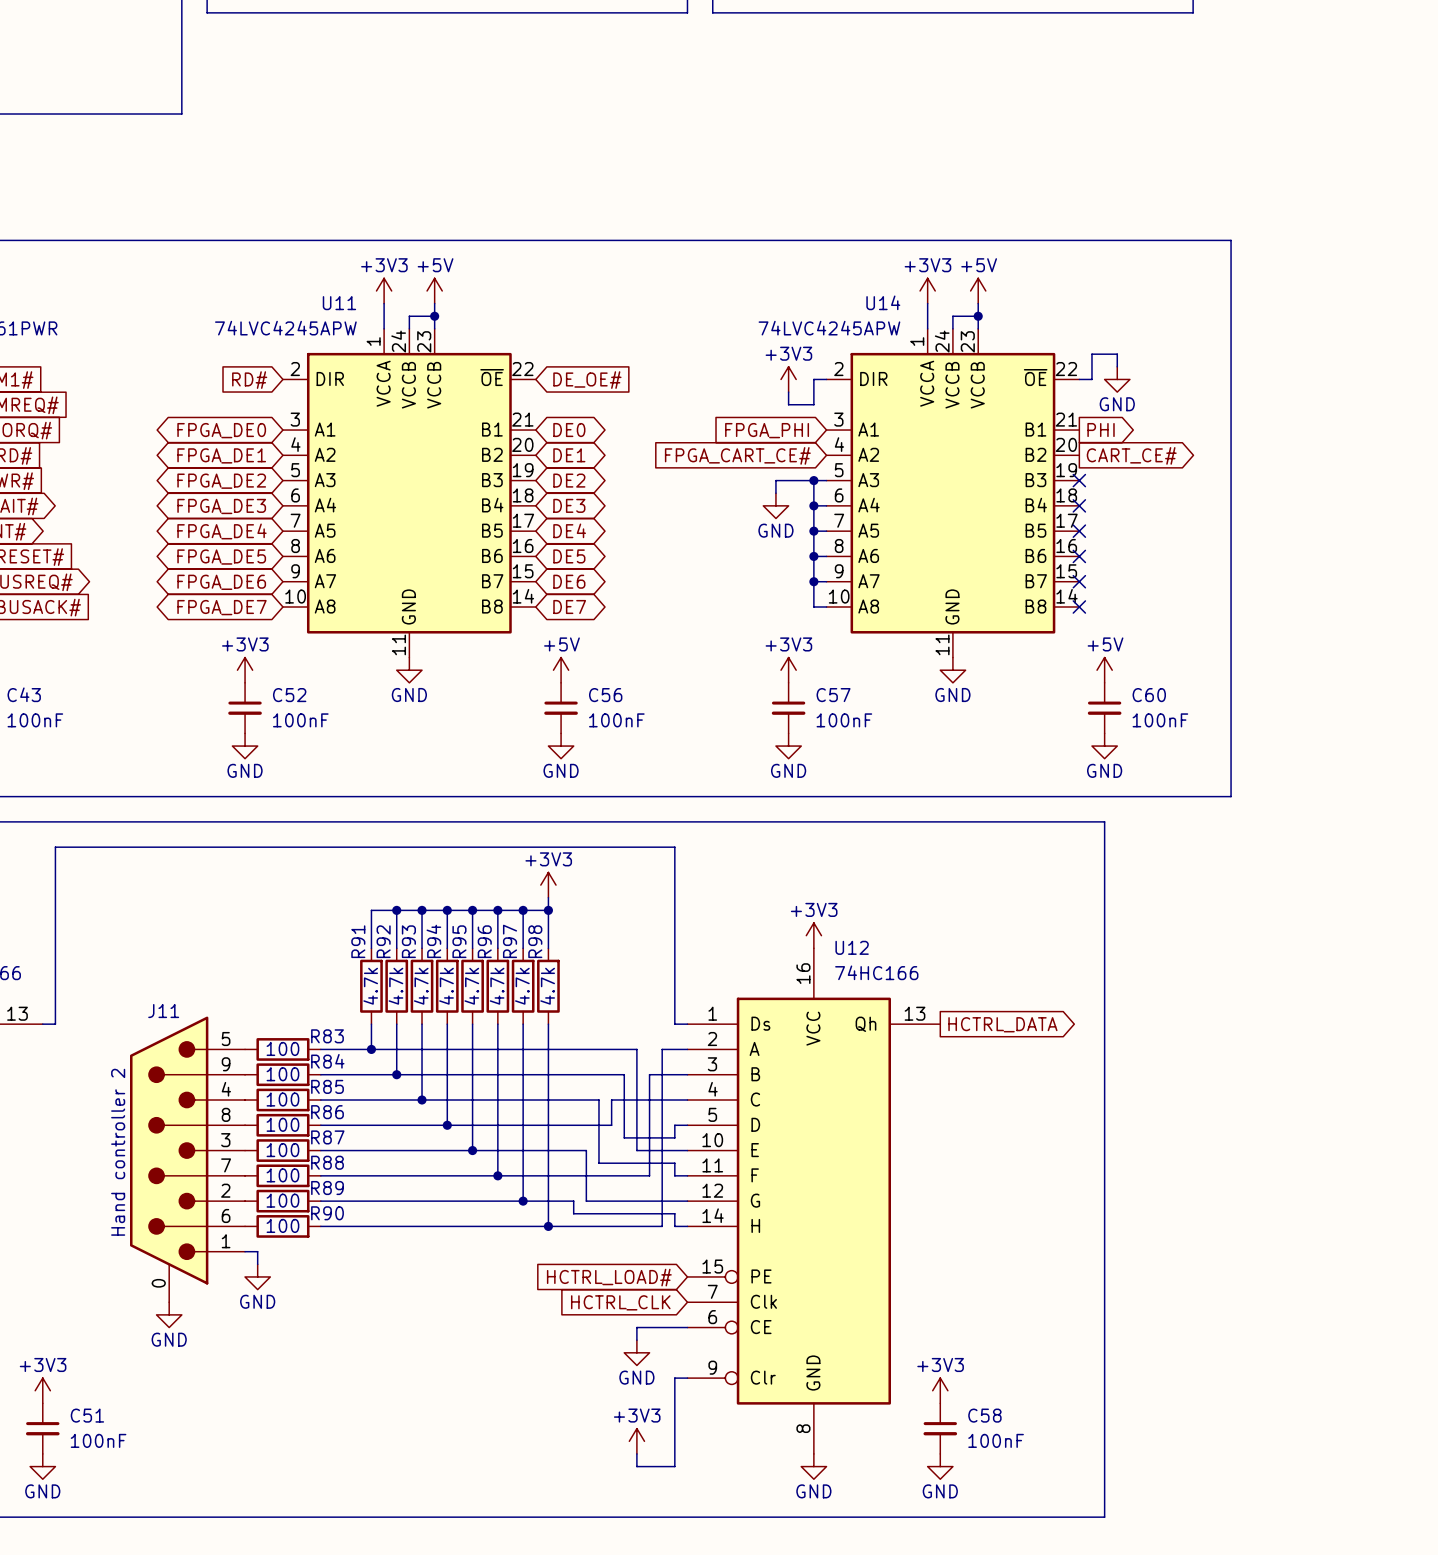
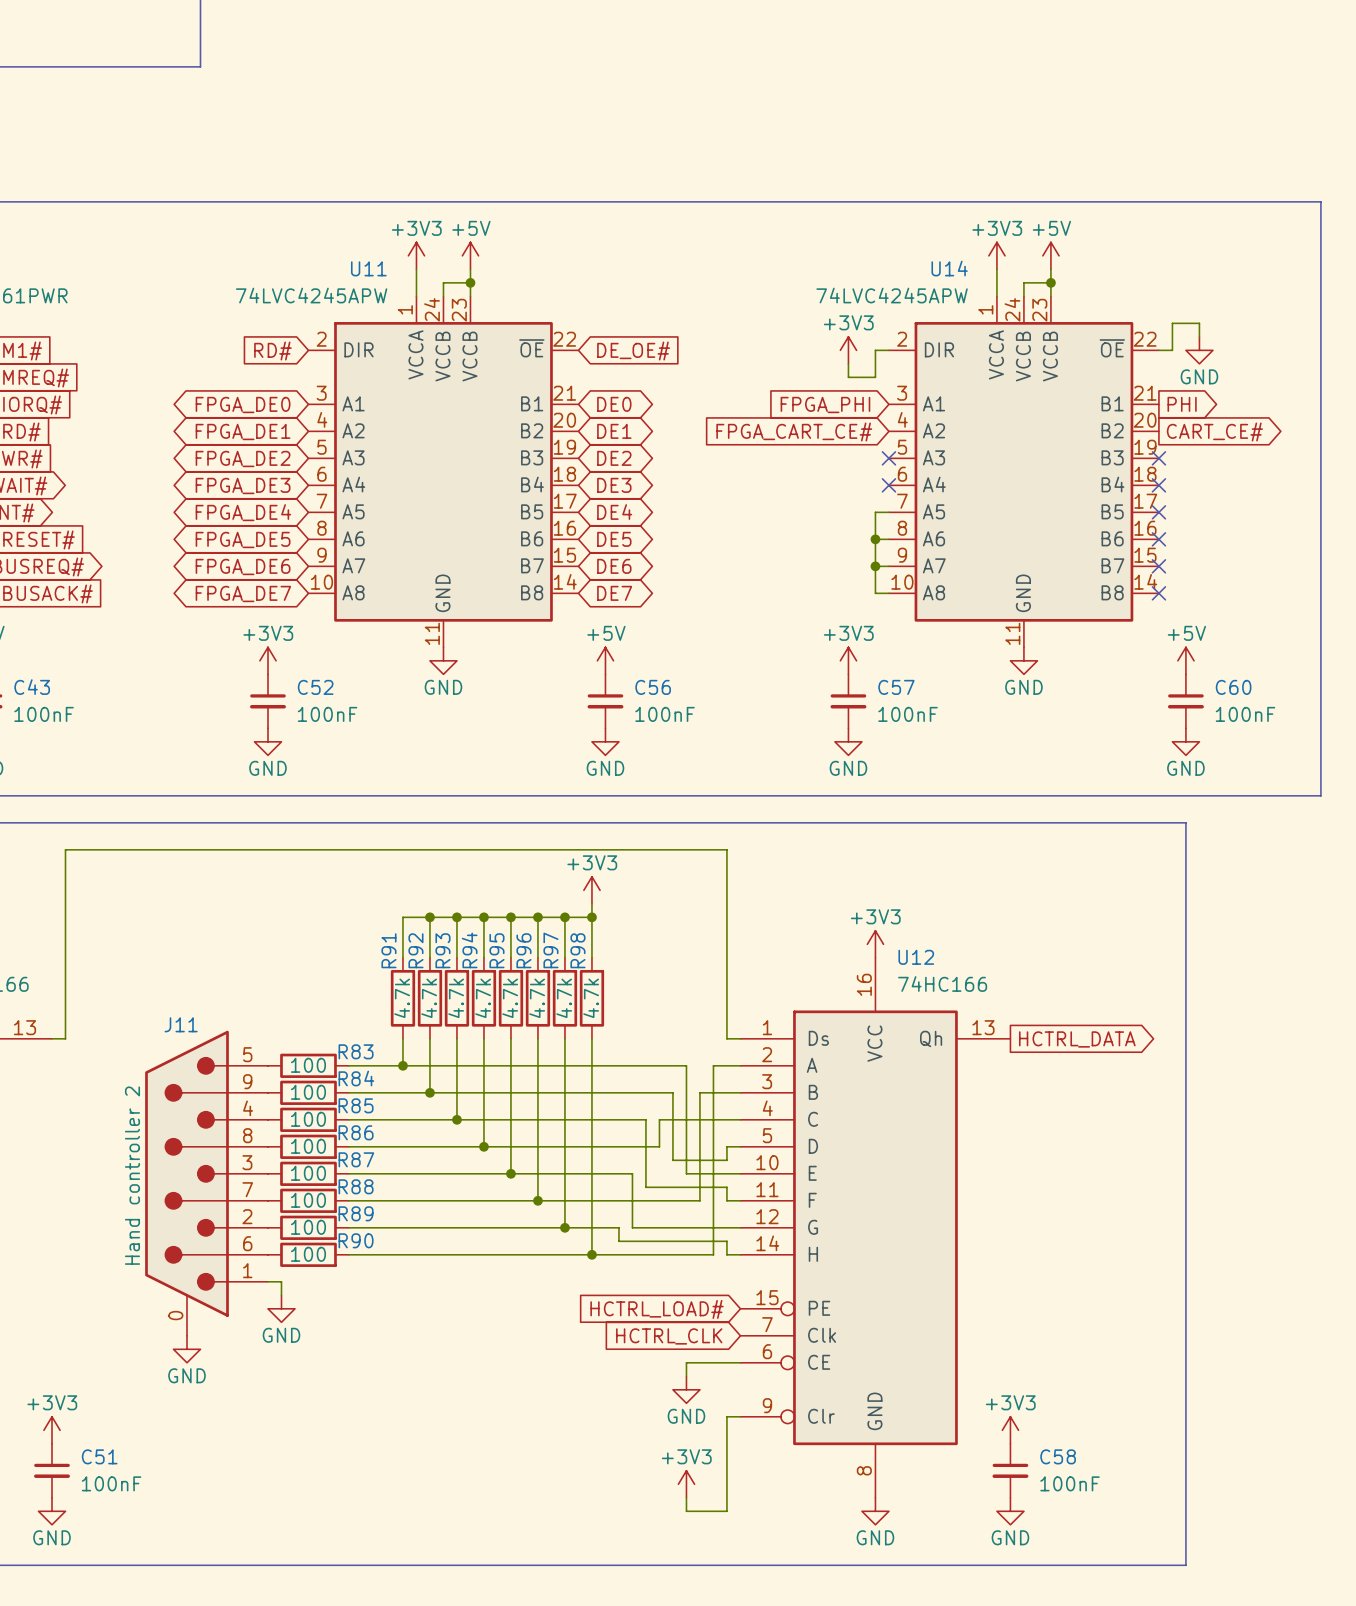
wire: (813, 480) (813, 531) -> none
junction: (813, 480) -> none
wire: (826, 480) (775, 480) (775, 493) -> none
no-connect mark: none -> (888, 458)
power symbol: GND (775, 505) -> none
wire: (813, 505) (826, 505) -> none
junction: (813, 505) -> none
no-connect mark: none -> (888, 485)
junction: (813, 531) -> none

